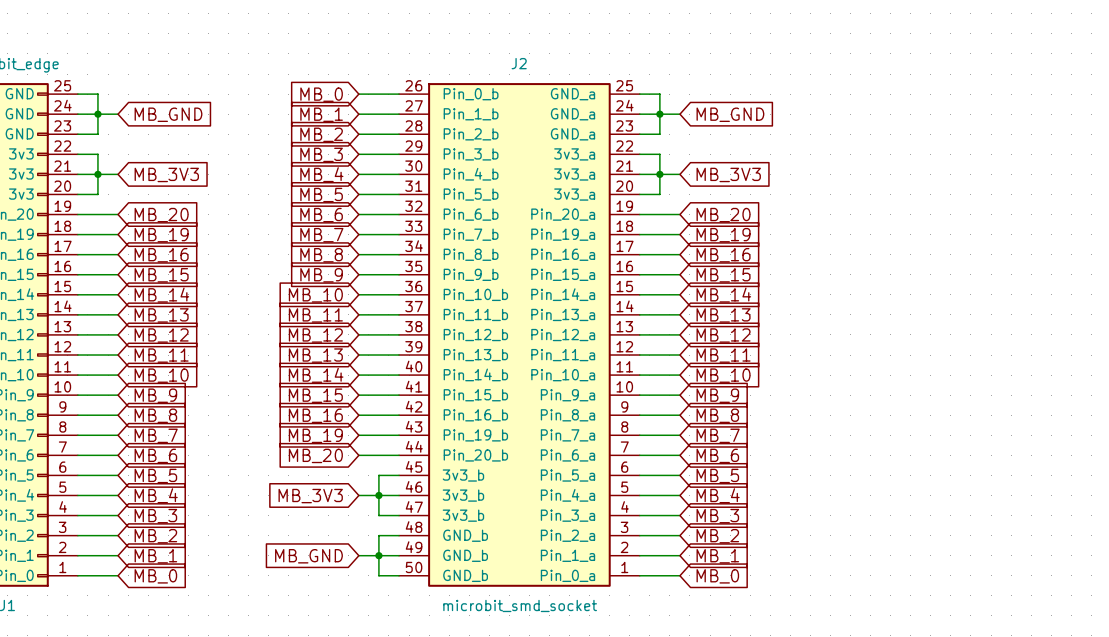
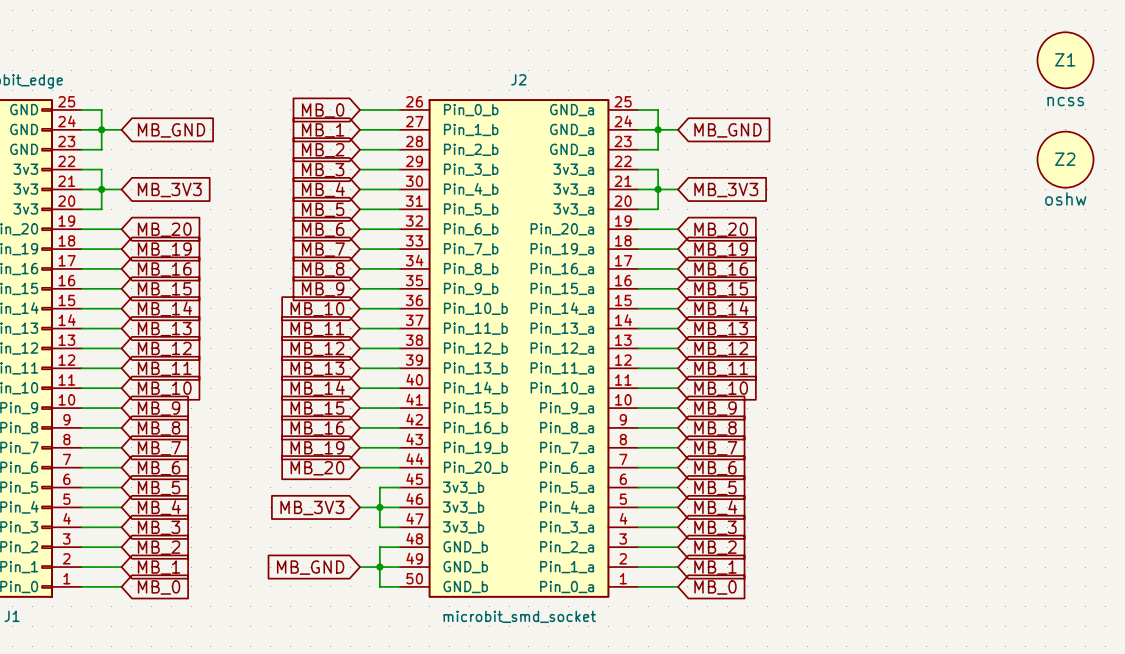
Z1: none -> ncss (1065, 60)
Z2: none -> oshw (1065, 159)

